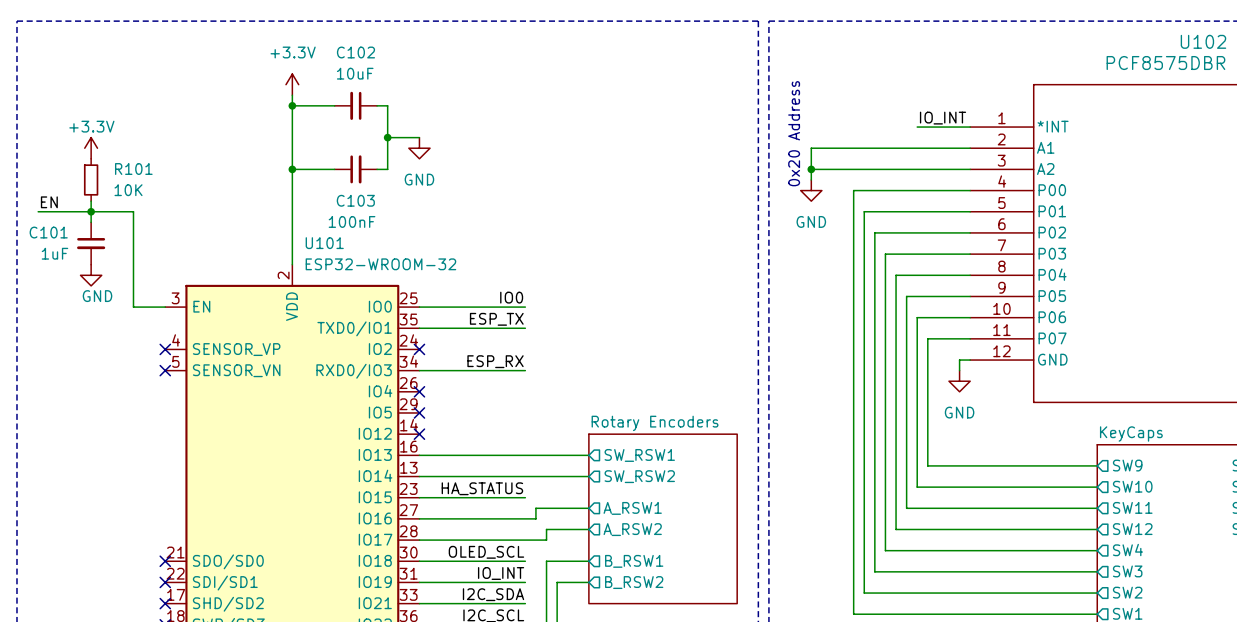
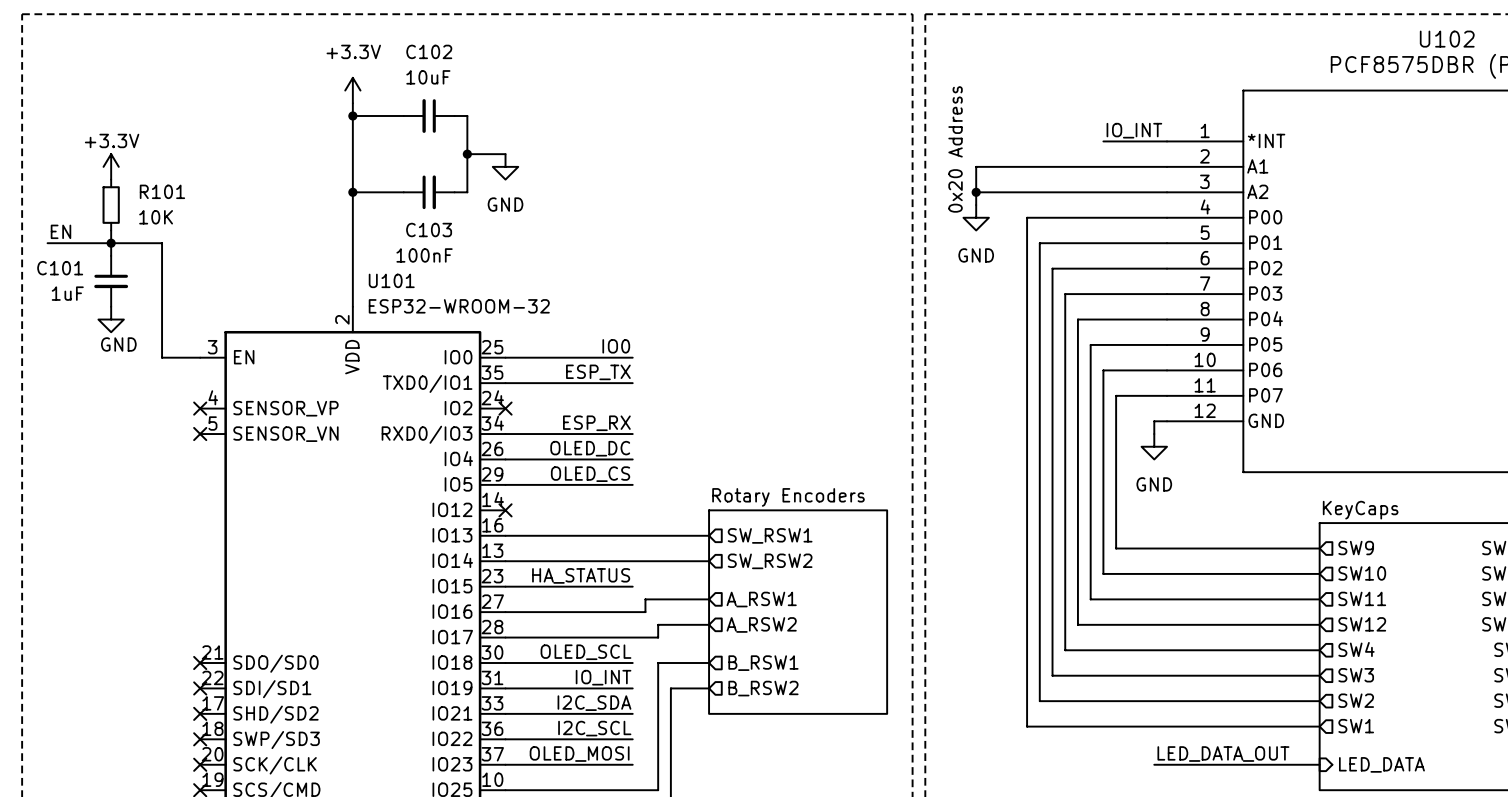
label: none -> OLED_DC (590, 448)
wire: none -> (505, 459) (632, 459)
no-connect mark: (419, 391) -> none
label: none -> OLED_CS (590, 474)
wire: none -> (505, 484) (632, 484)
no-connect mark: (419, 412) -> none

